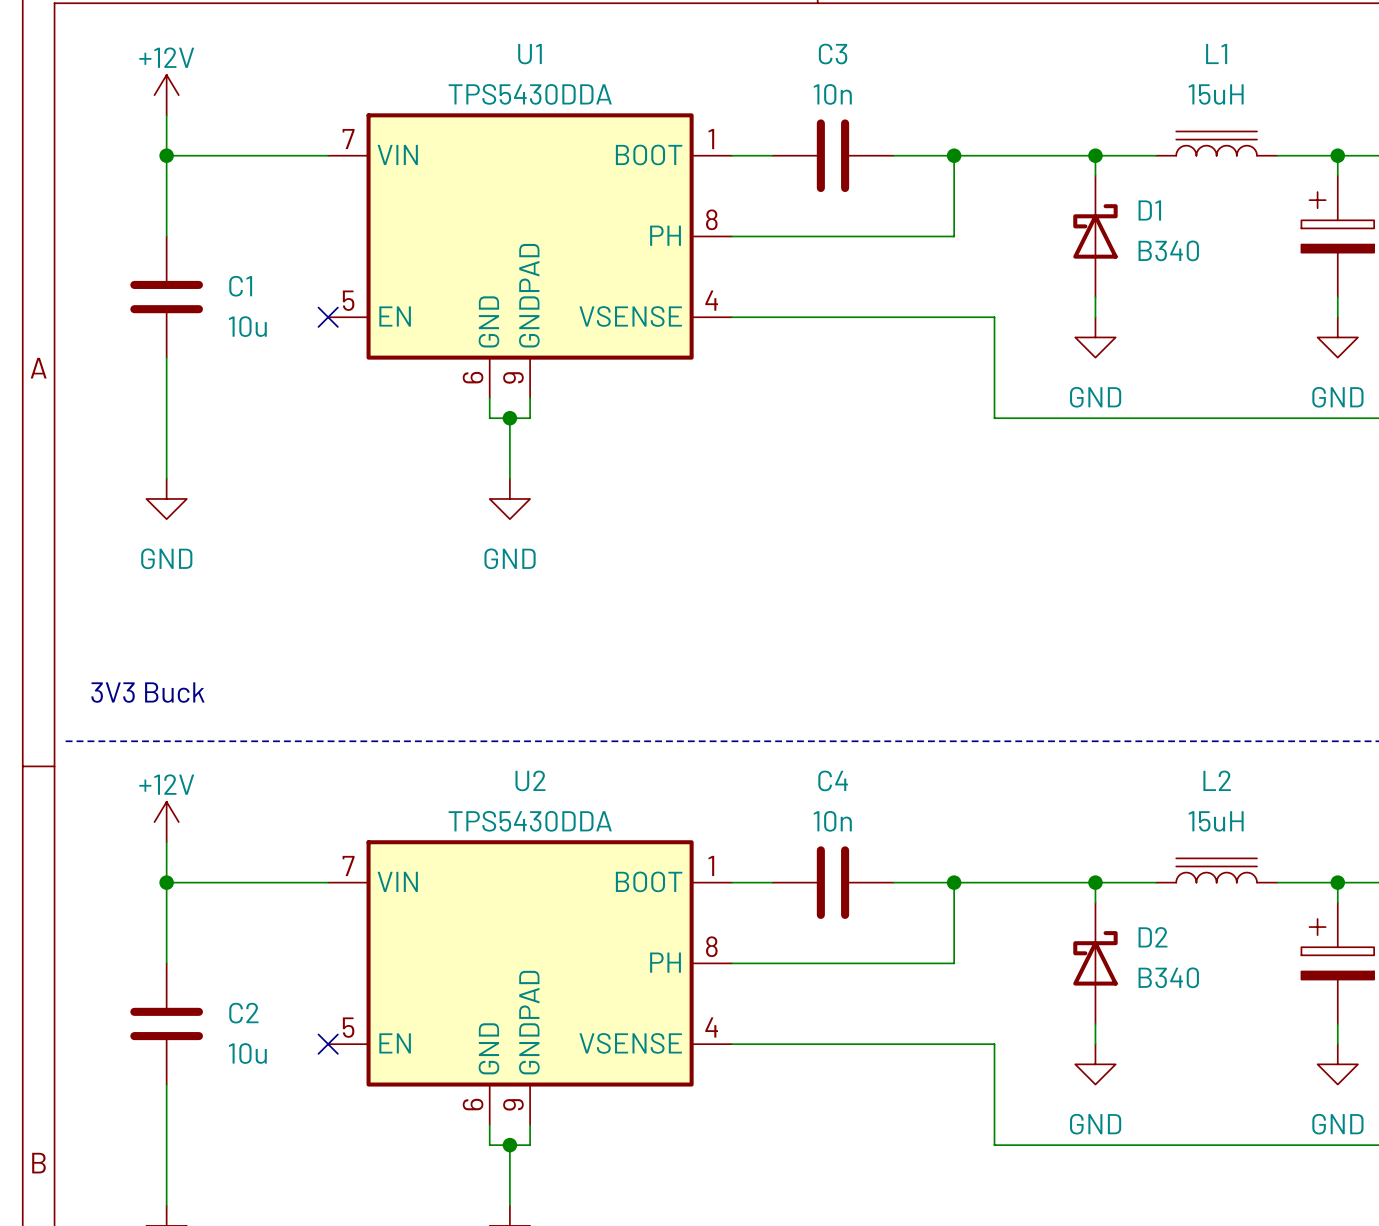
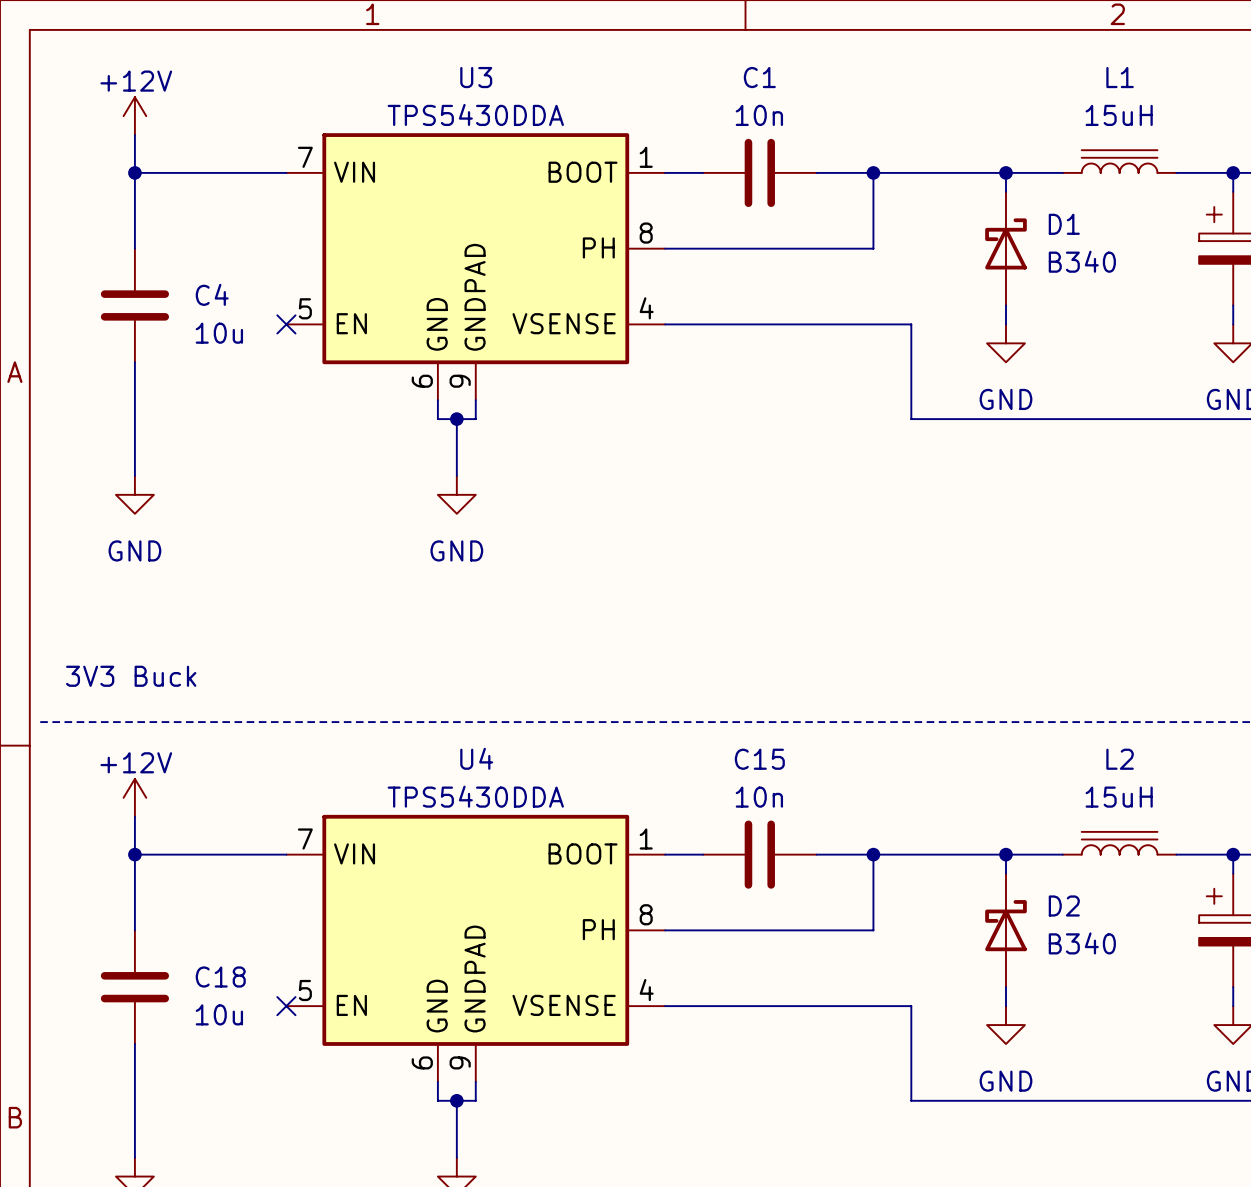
U1 name: U1 (529, 54) -> U3 (476, 77)
C3 name: C3 (833, 54) -> C1 (759, 77)
C1 name: C1 (240, 286) -> C4 (212, 294)
U2 name: U2 (530, 780) -> U4 (476, 758)
C4 name: C4 (833, 780) -> C15 (759, 759)
C2 name: C2 (243, 1013) -> C18 (220, 977)

